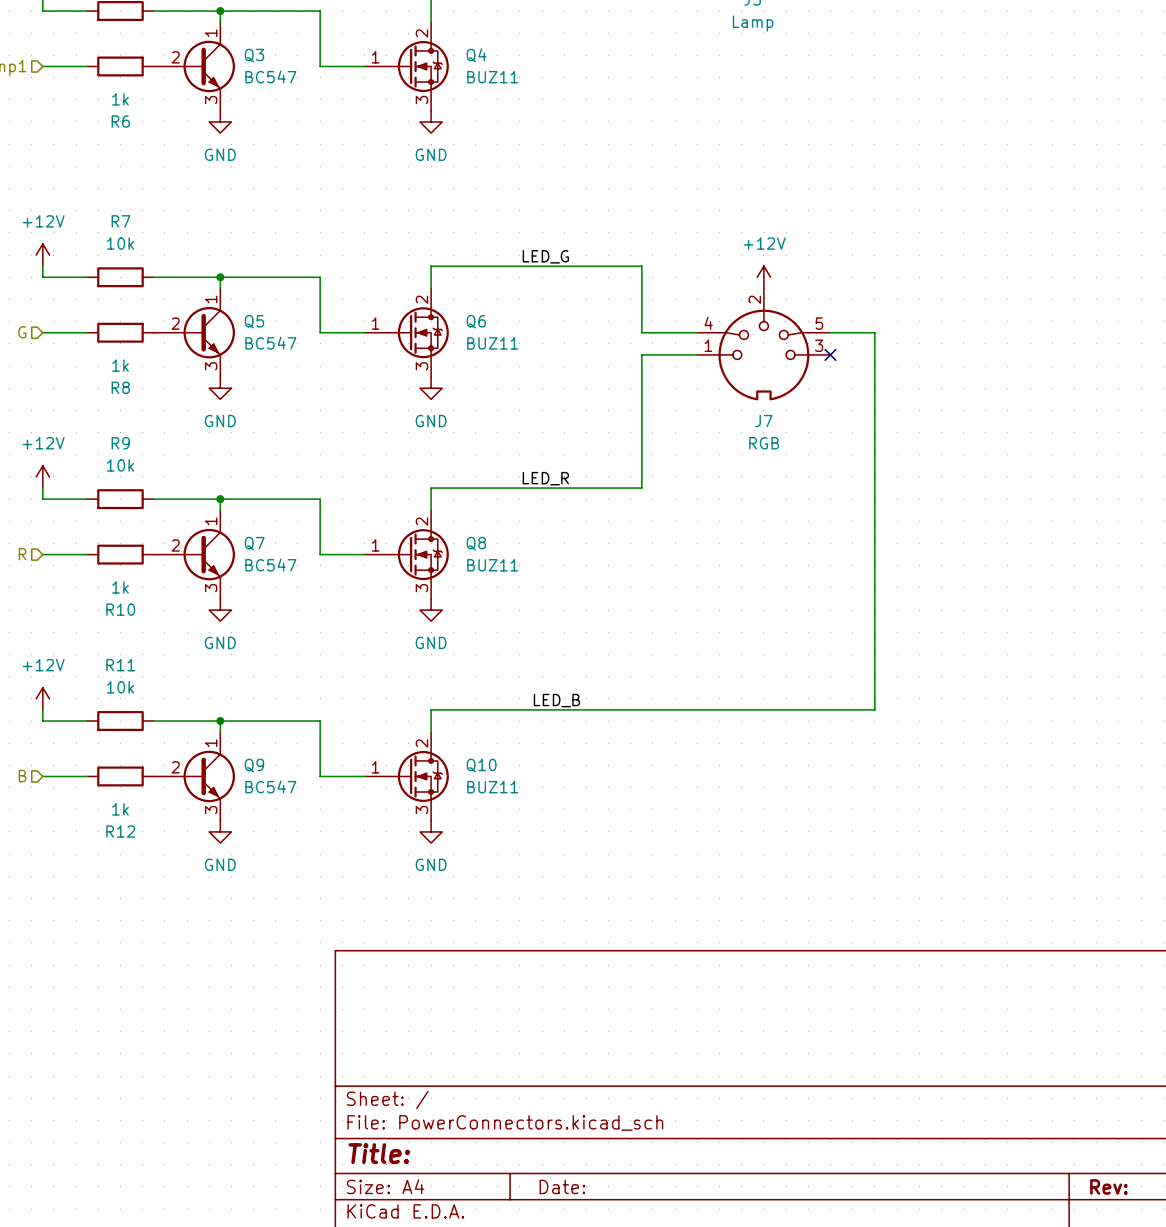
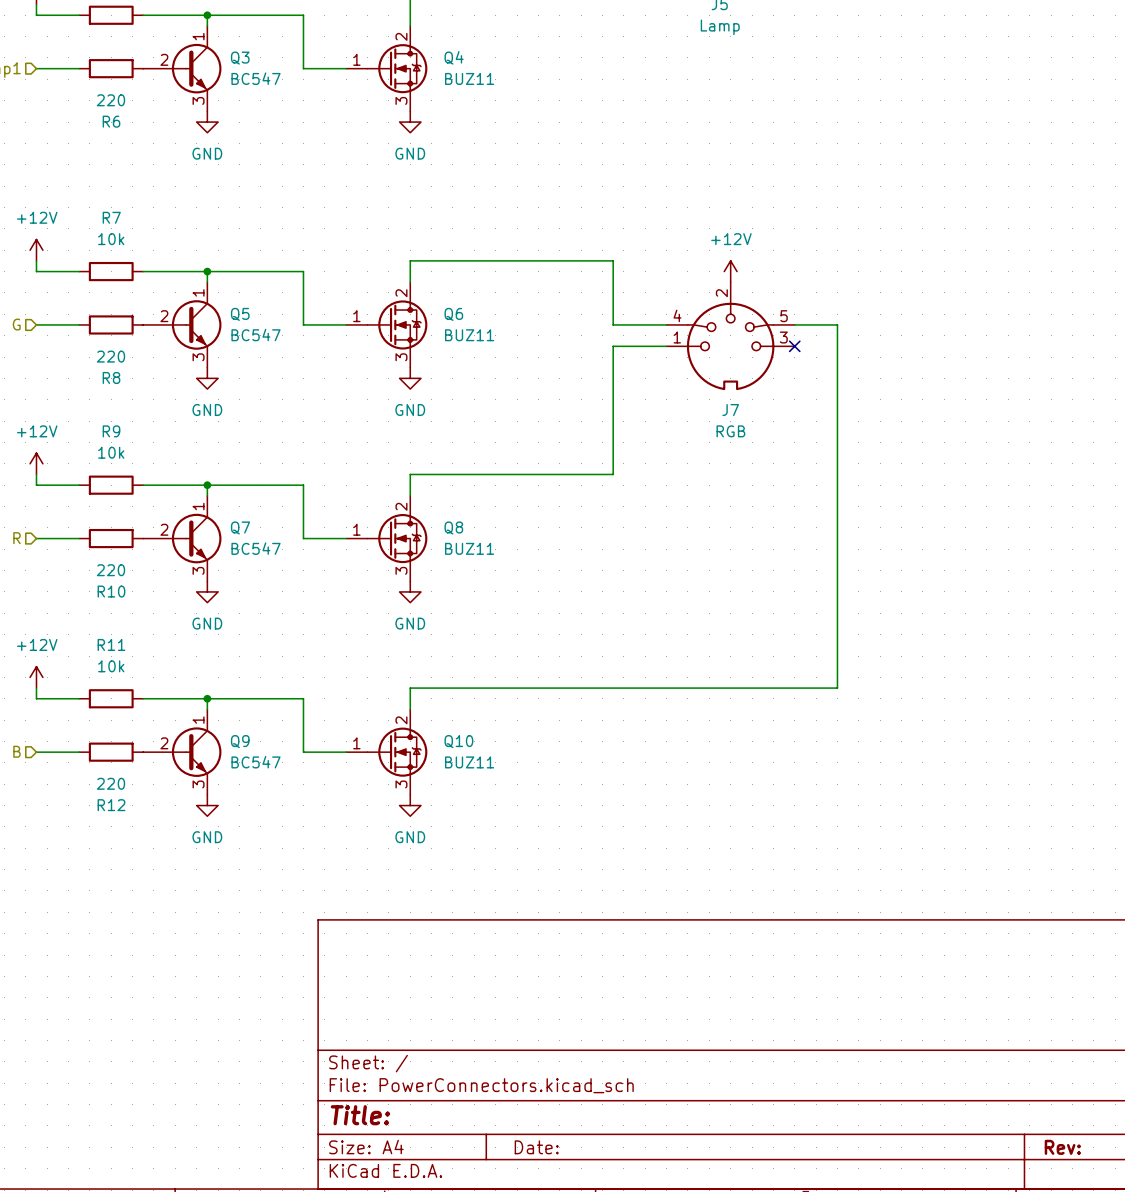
R6 value: 1k (120, 99) -> 220 (110, 100)
label: LED_G (545, 256) -> none
R8 value: 1k (120, 365) -> 220 (110, 356)
label: LED_R (545, 478) -> none
R10 value: 1k (120, 587) -> 220 (110, 570)
label: LED_B (556, 700) -> none
R12 value: 1k (120, 809) -> 220 (110, 783)

